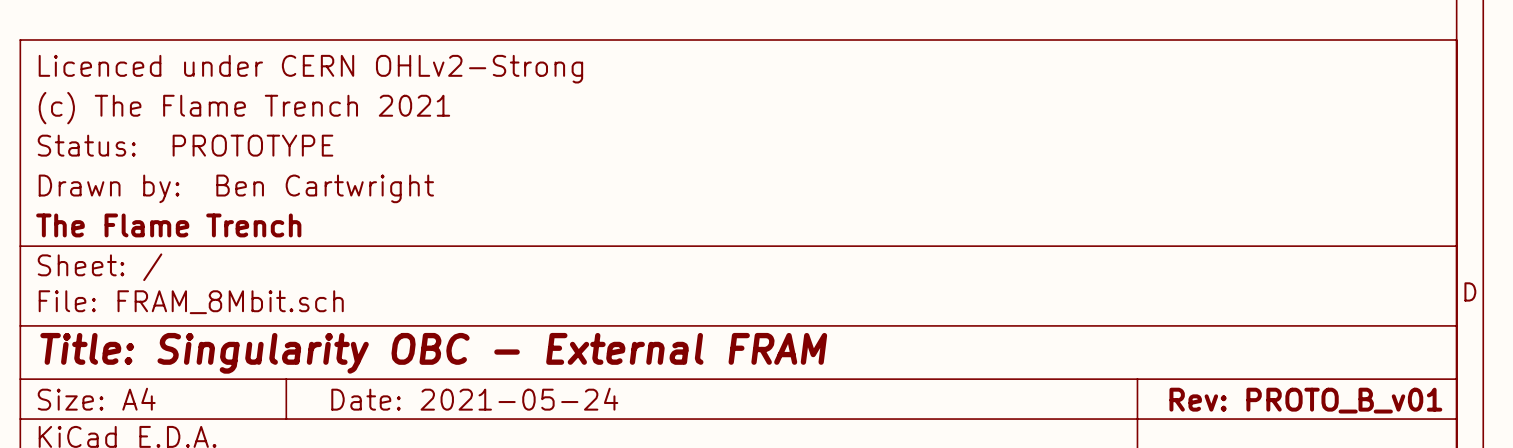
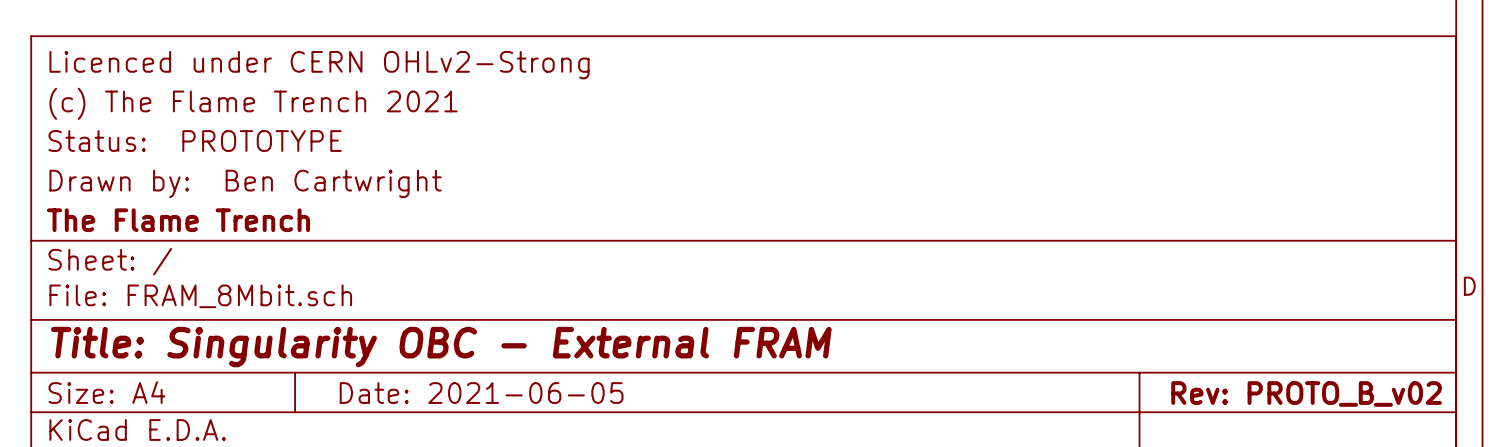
title block: Date: 2021-05-24 (474, 399) -> Date: 2021-06-05 (481, 393)
title block: Rev: PROTO_B_v01 (1305, 400) -> Rev: PROTO_B_v02 (1306, 393)

